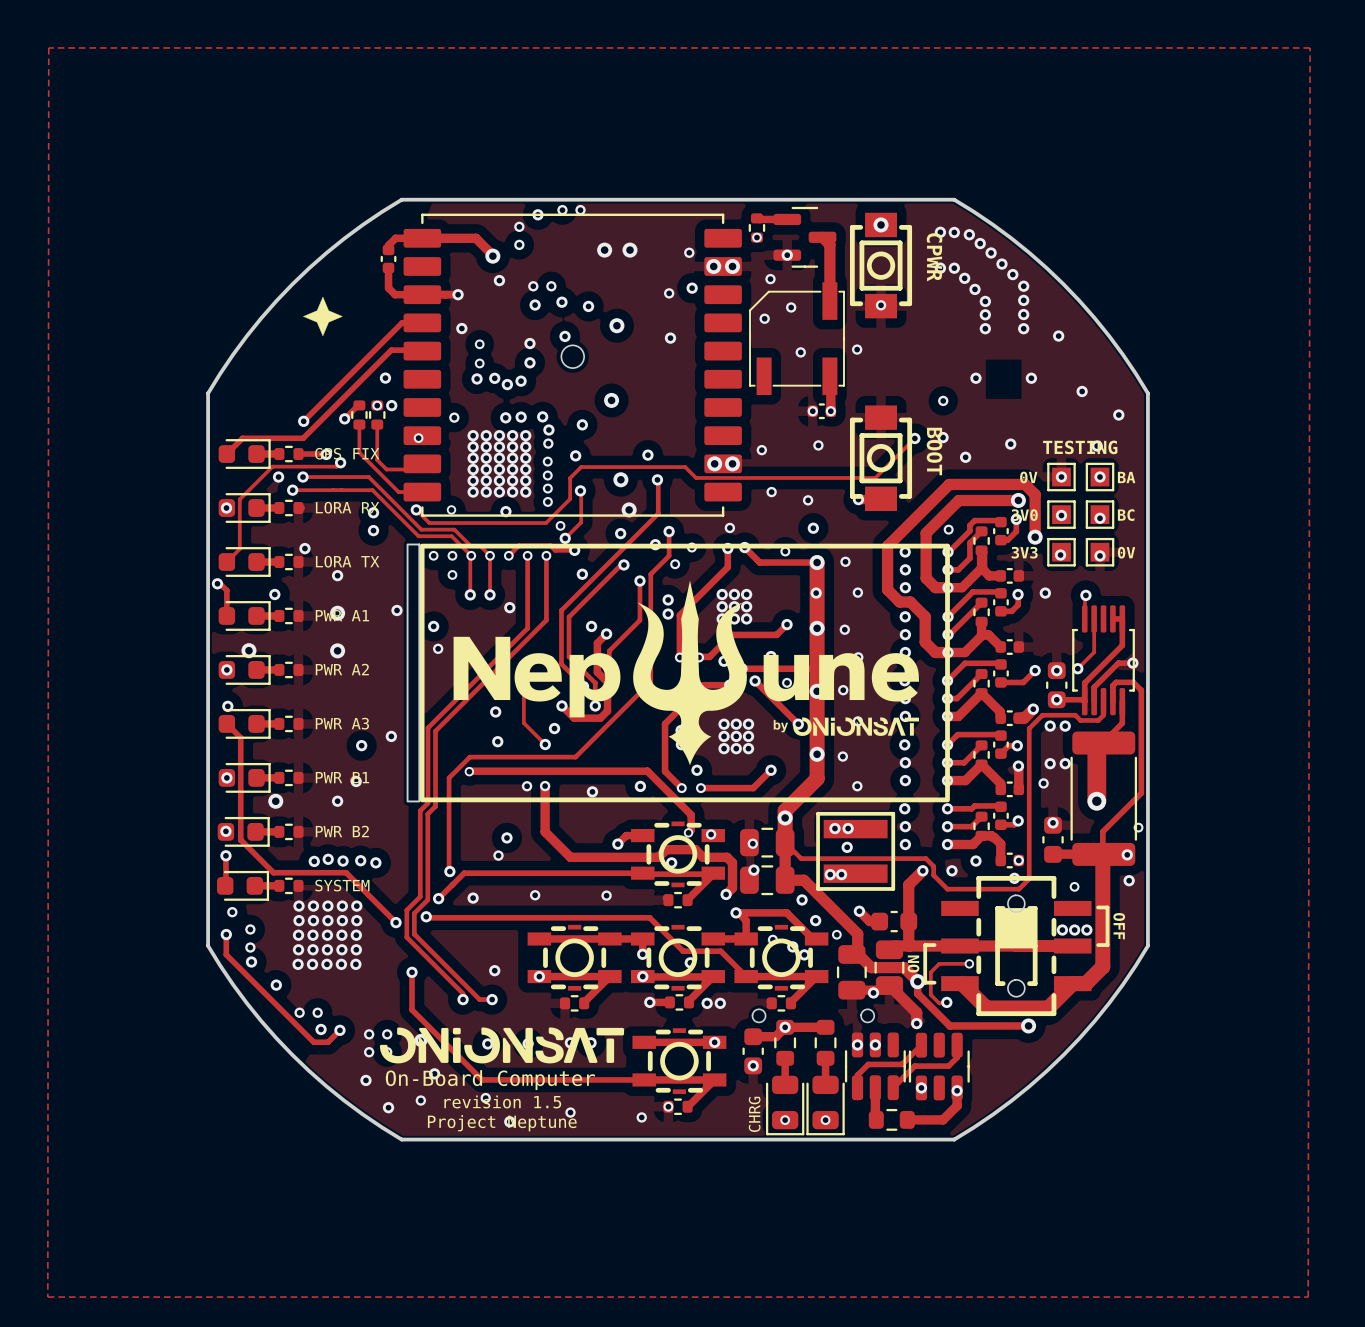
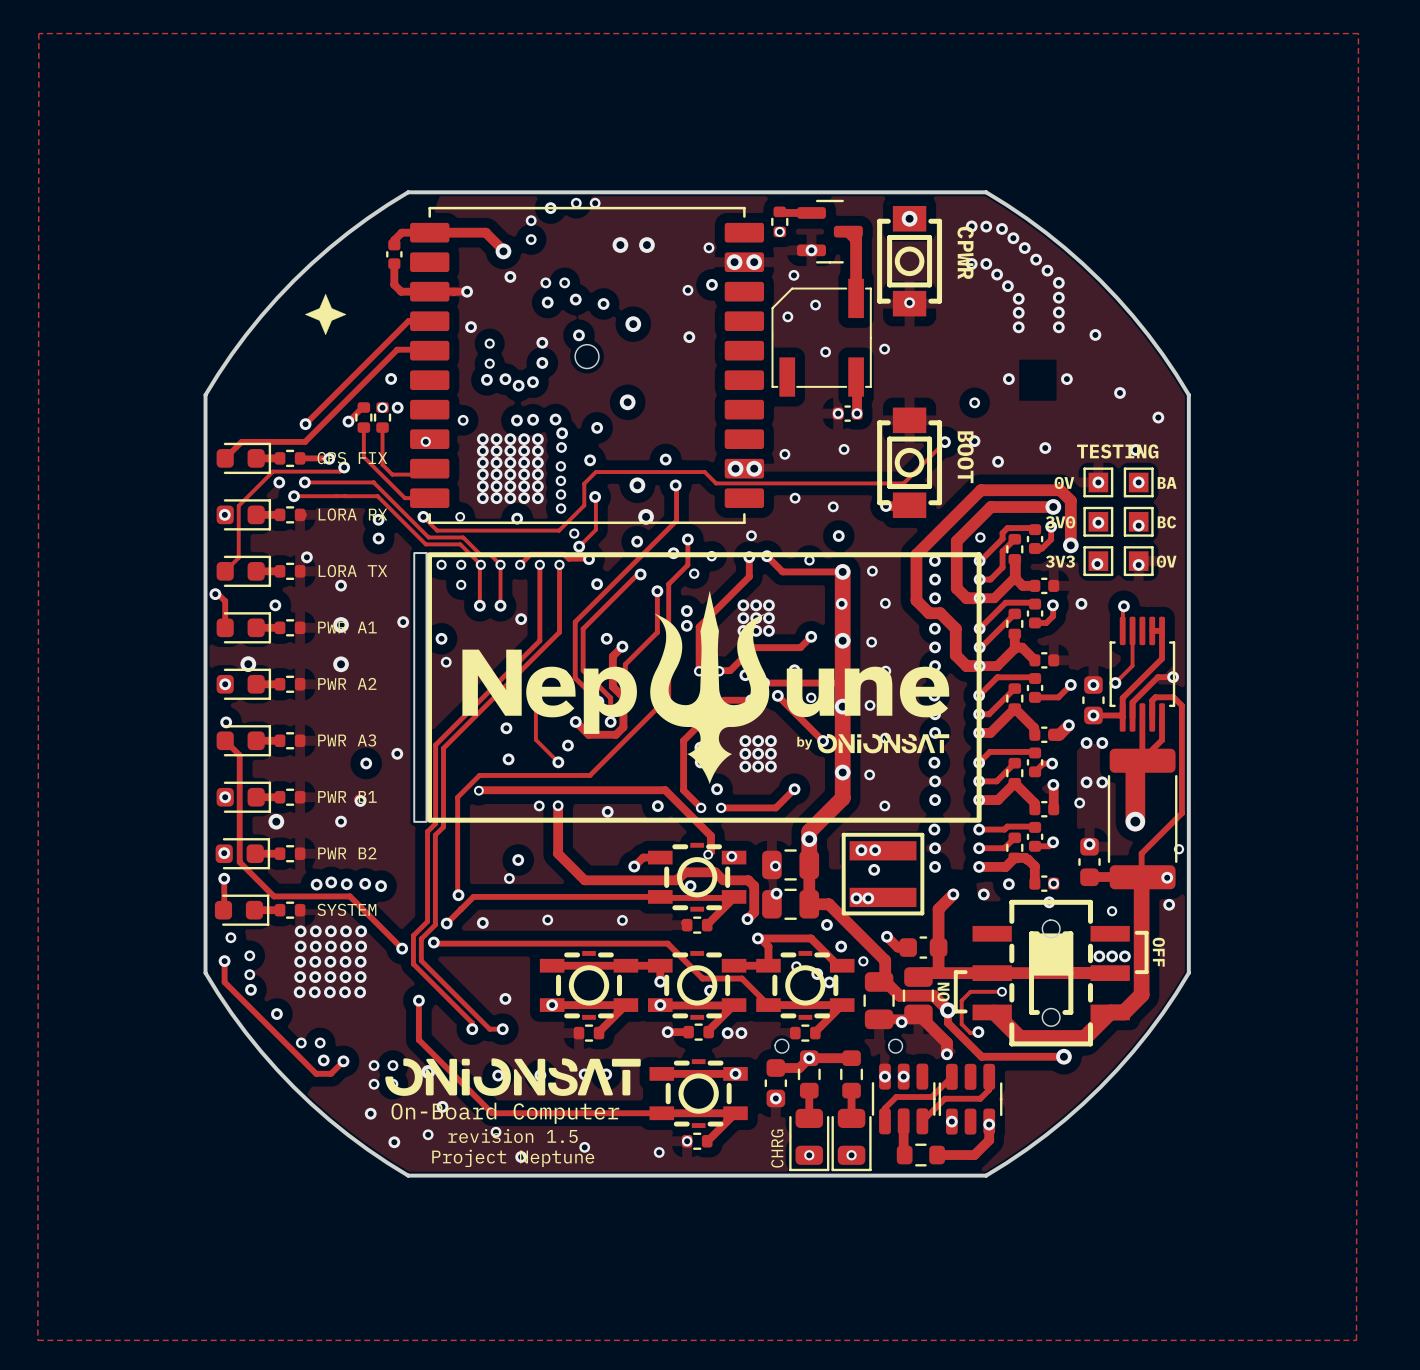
track: (1103, 715) (1098, 720) (1080, 720) (1075, 715) (1042, 715) (1029, 728) (1029, 878) (1018, 889) (947, 889) (933, 875) (933, 866) (925, 858) (801, 858) (785, 842) -> (1142, 731) (1142, 760)

